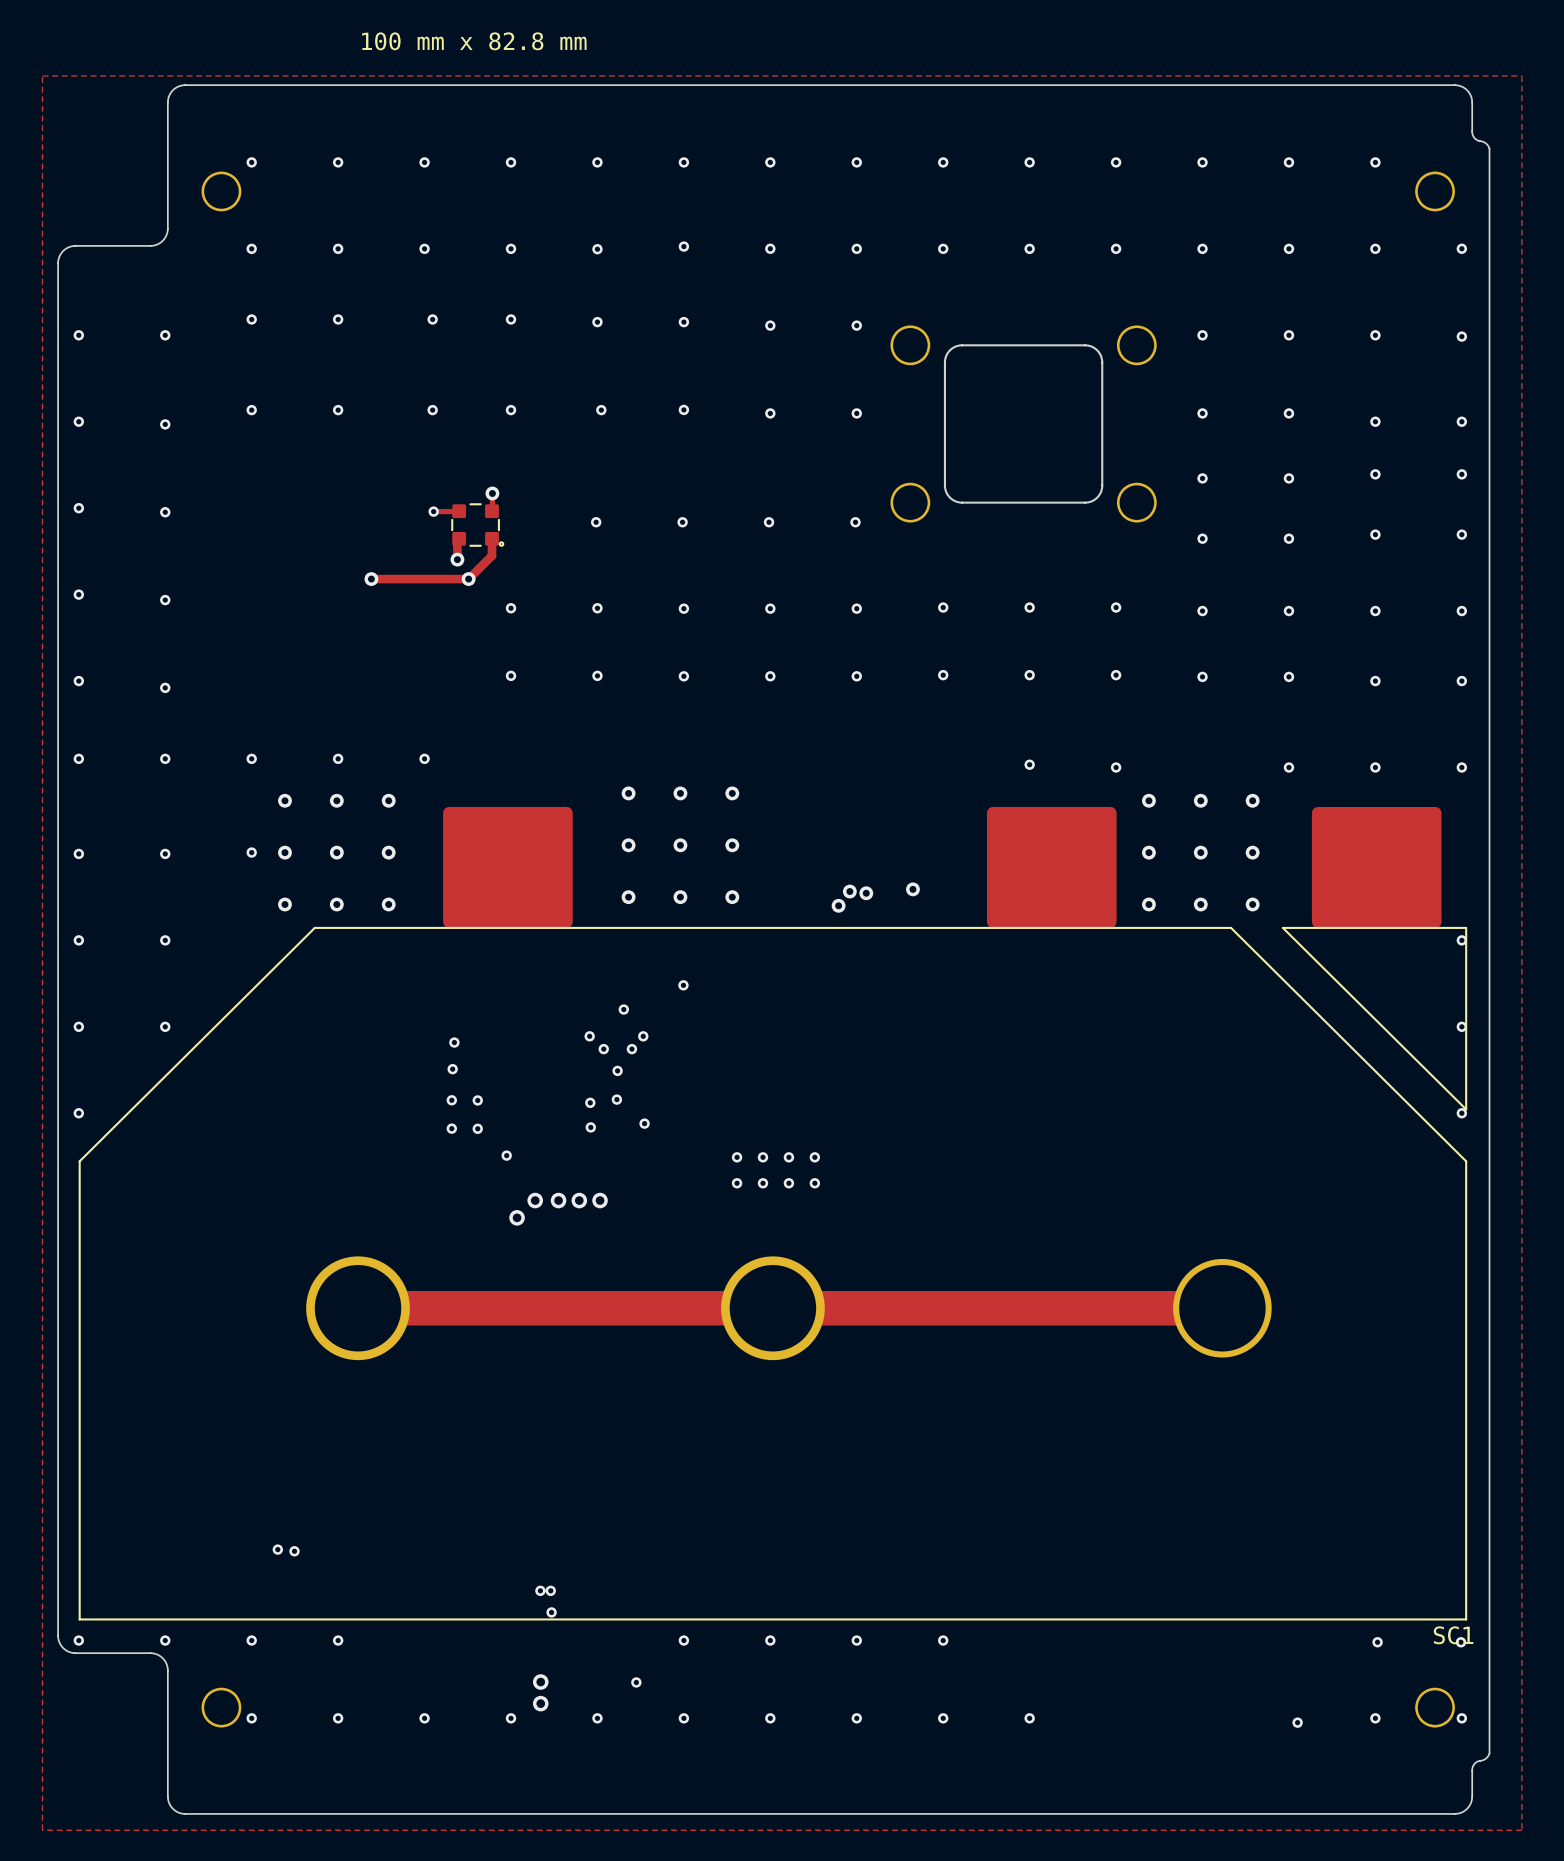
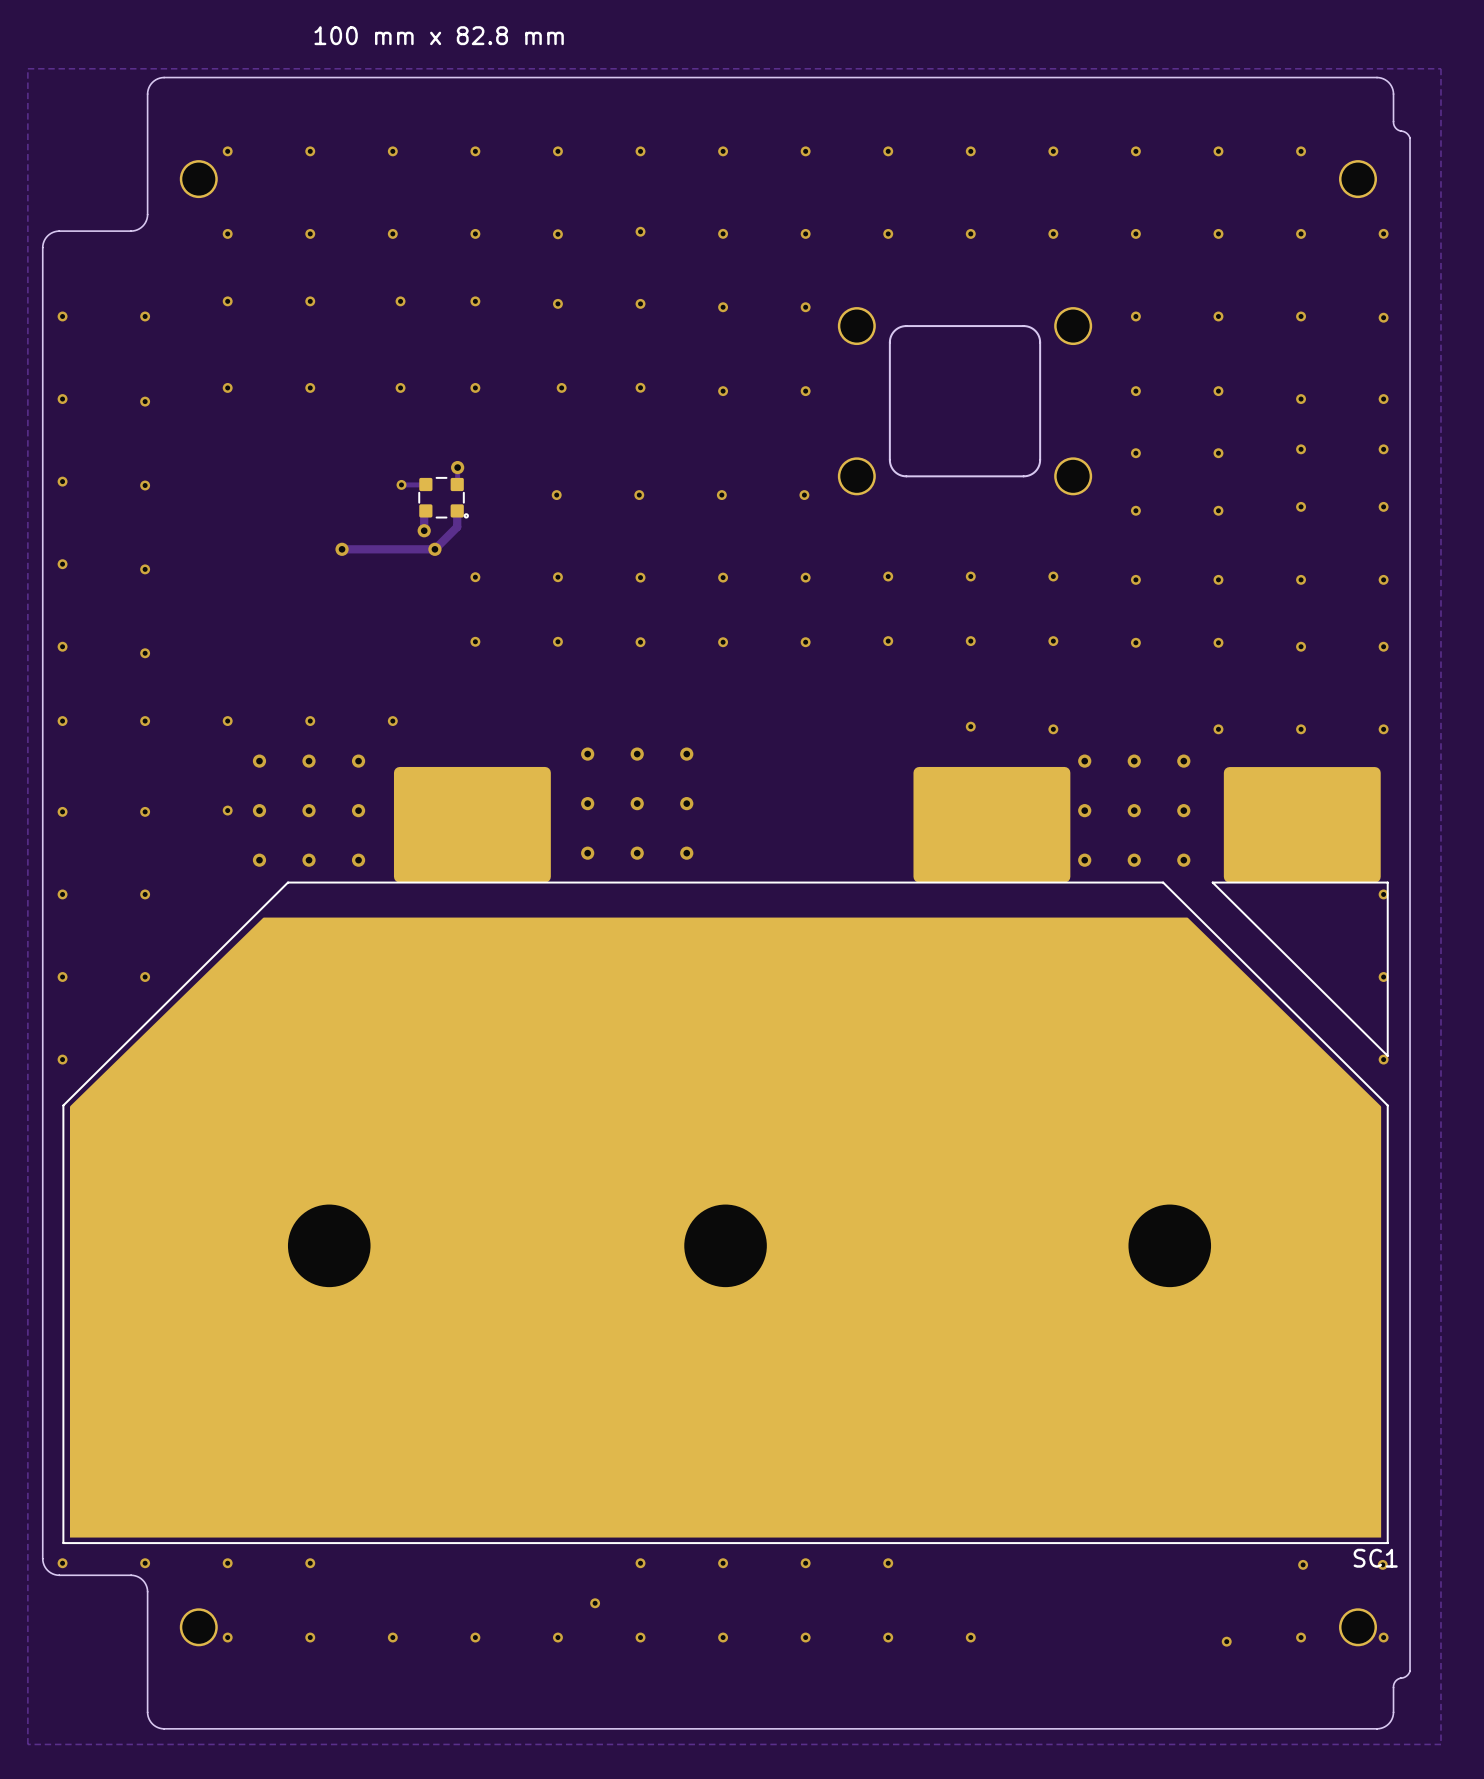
SC1 footprint: [78, 806, 1468, 1621] -> [62, 766, 1389, 1545]
via: (912, 889) -> none
via: (849, 891) -> none
via: (866, 893) -> none
via: (838, 905) -> none
via: (683, 985) -> none
via: (623, 1009) -> none
via: (589, 1036) -> none
via: (643, 1036) -> none
via: (454, 1042) -> none
via: (603, 1049) -> none
via: (631, 1049) -> none
via: (452, 1069) -> none
via: (617, 1070) -> none
via: (616, 1099) -> none
via: (451, 1100) -> none
via: (477, 1100) -> none
via: (590, 1102) -> none
via: (644, 1123) -> none
via: (590, 1127) -> none
via: (451, 1128) -> none
via: (477, 1128) -> none
via: (506, 1155) -> none
via: (737, 1157) -> none
via: (762, 1157) -> none
via: (788, 1157) -> none
via: (814, 1157) -> none
via: (737, 1183) -> none
via: (762, 1183) -> none
via: (788, 1183) -> none
via: (814, 1183) -> none
via: (535, 1200) -> none
via: (558, 1200) -> none
via: (579, 1200) -> none
via: (600, 1200) -> none
via: (517, 1217) -> none
track: (358, 1308) (1222, 1308) -> none
via: (277, 1549) -> none
via: (294, 1551) -> none
via: (540, 1590) -> none
via: (550, 1590) -> none
via: (551, 1612) -> none
via: (540, 1682) -> none
via: (540, 1703) -> none

